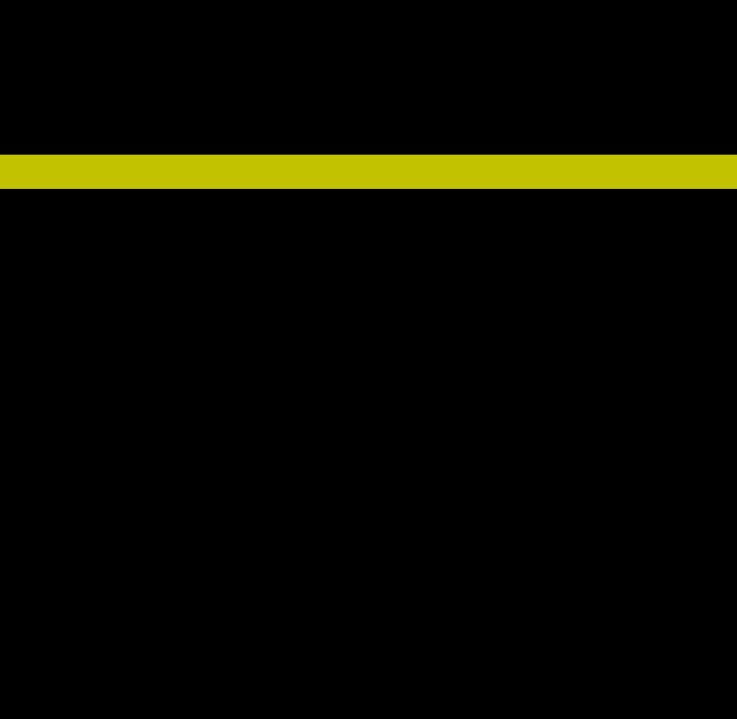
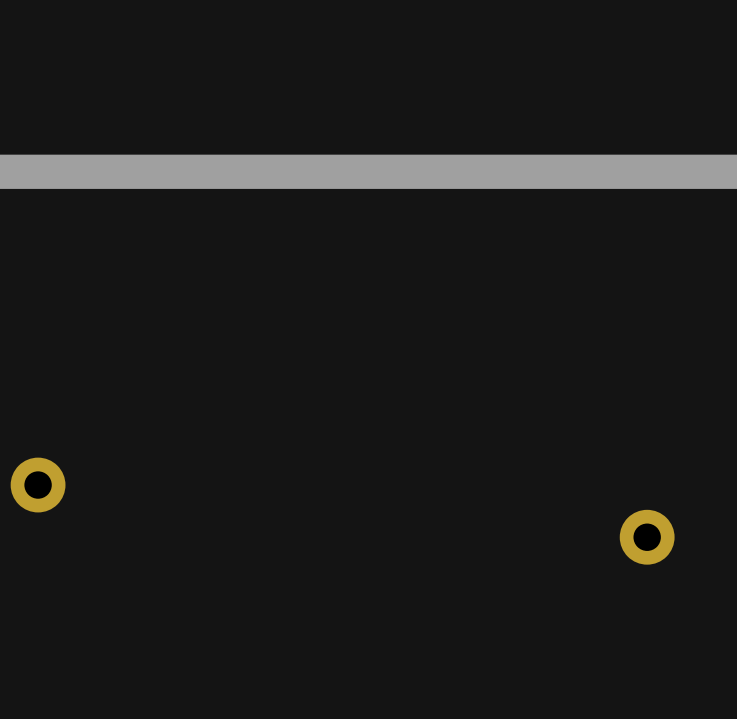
via: none -> (38, 485)
via: none -> (647, 537)

